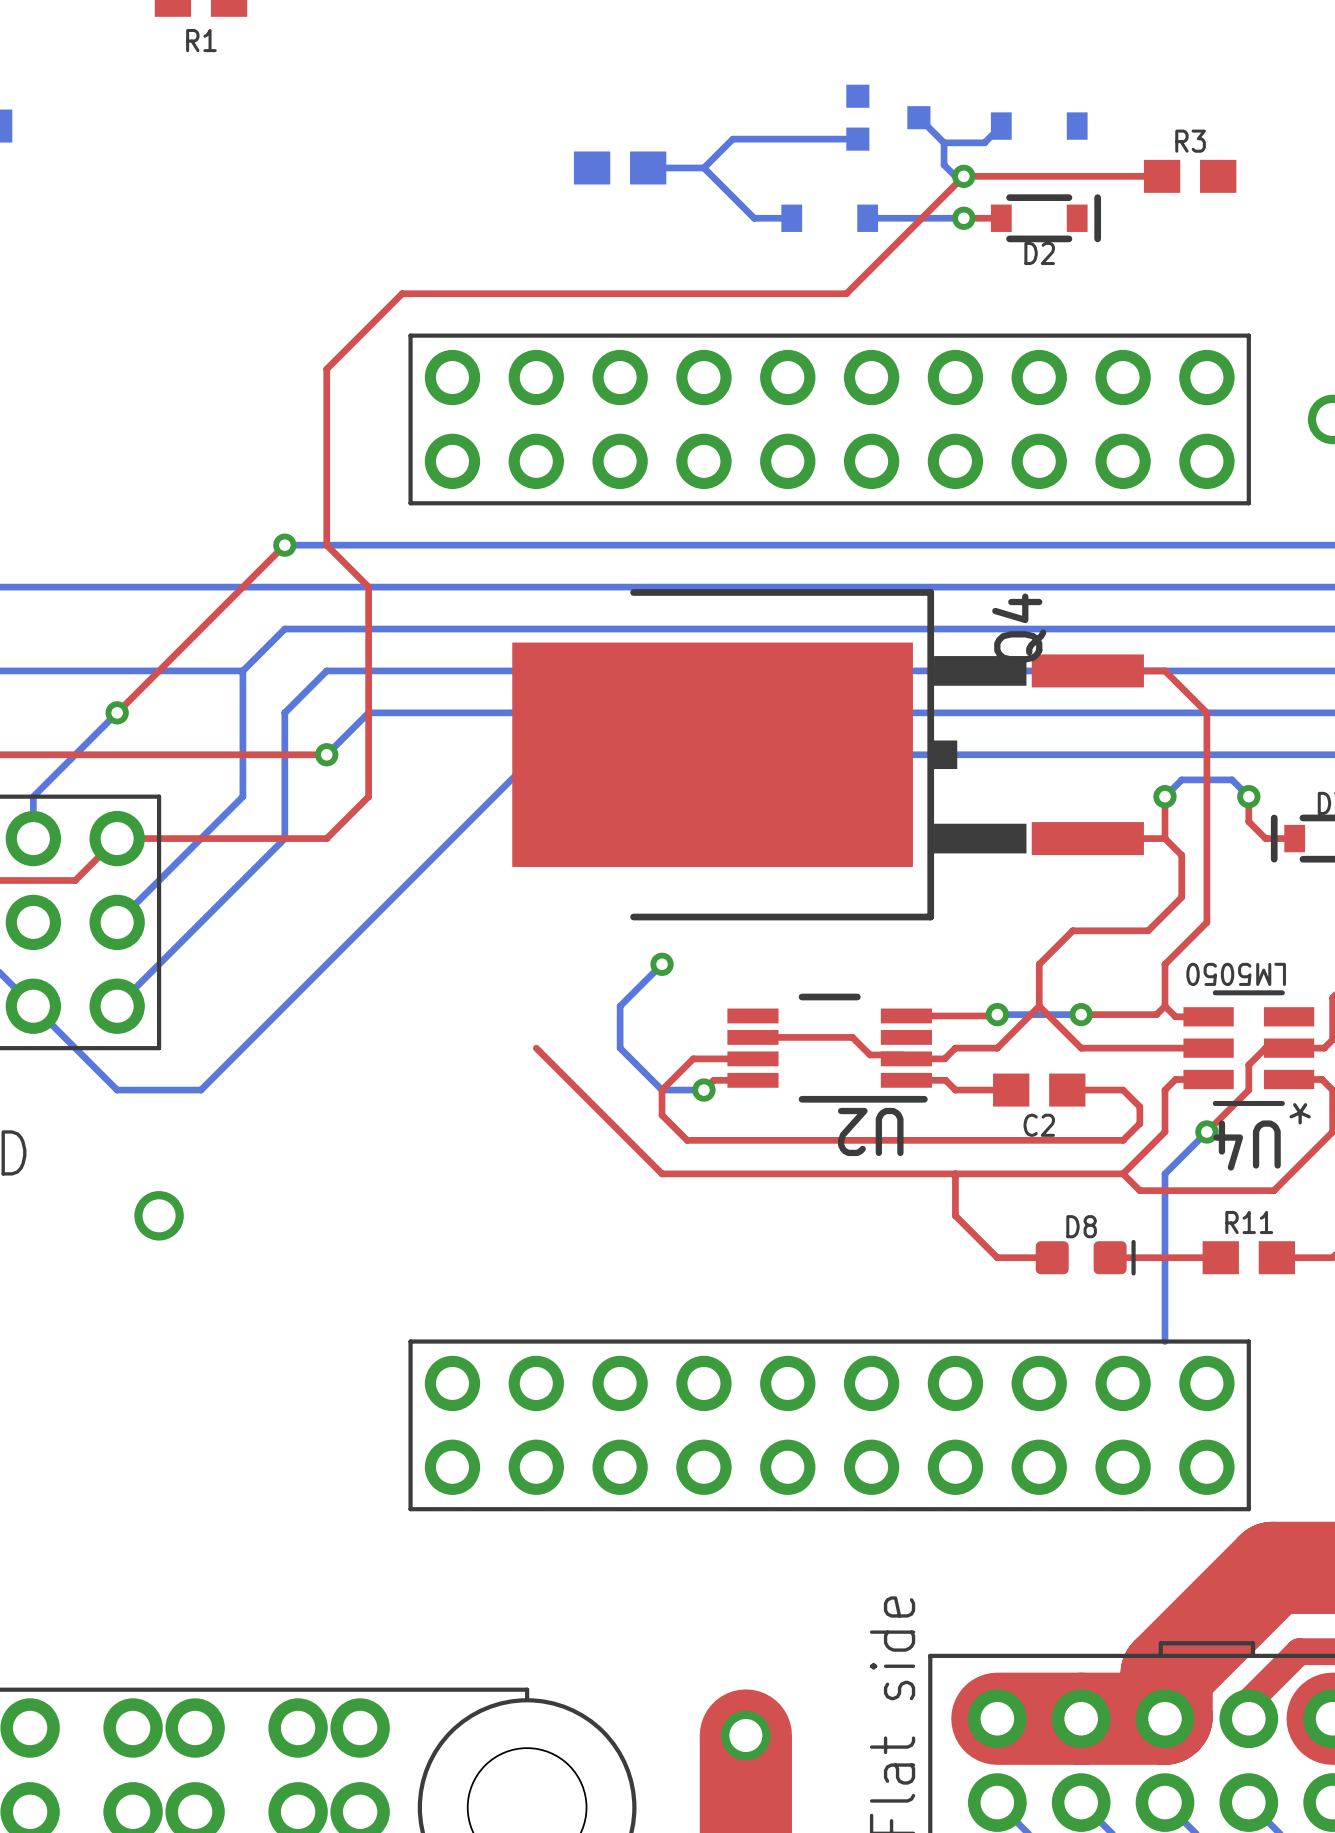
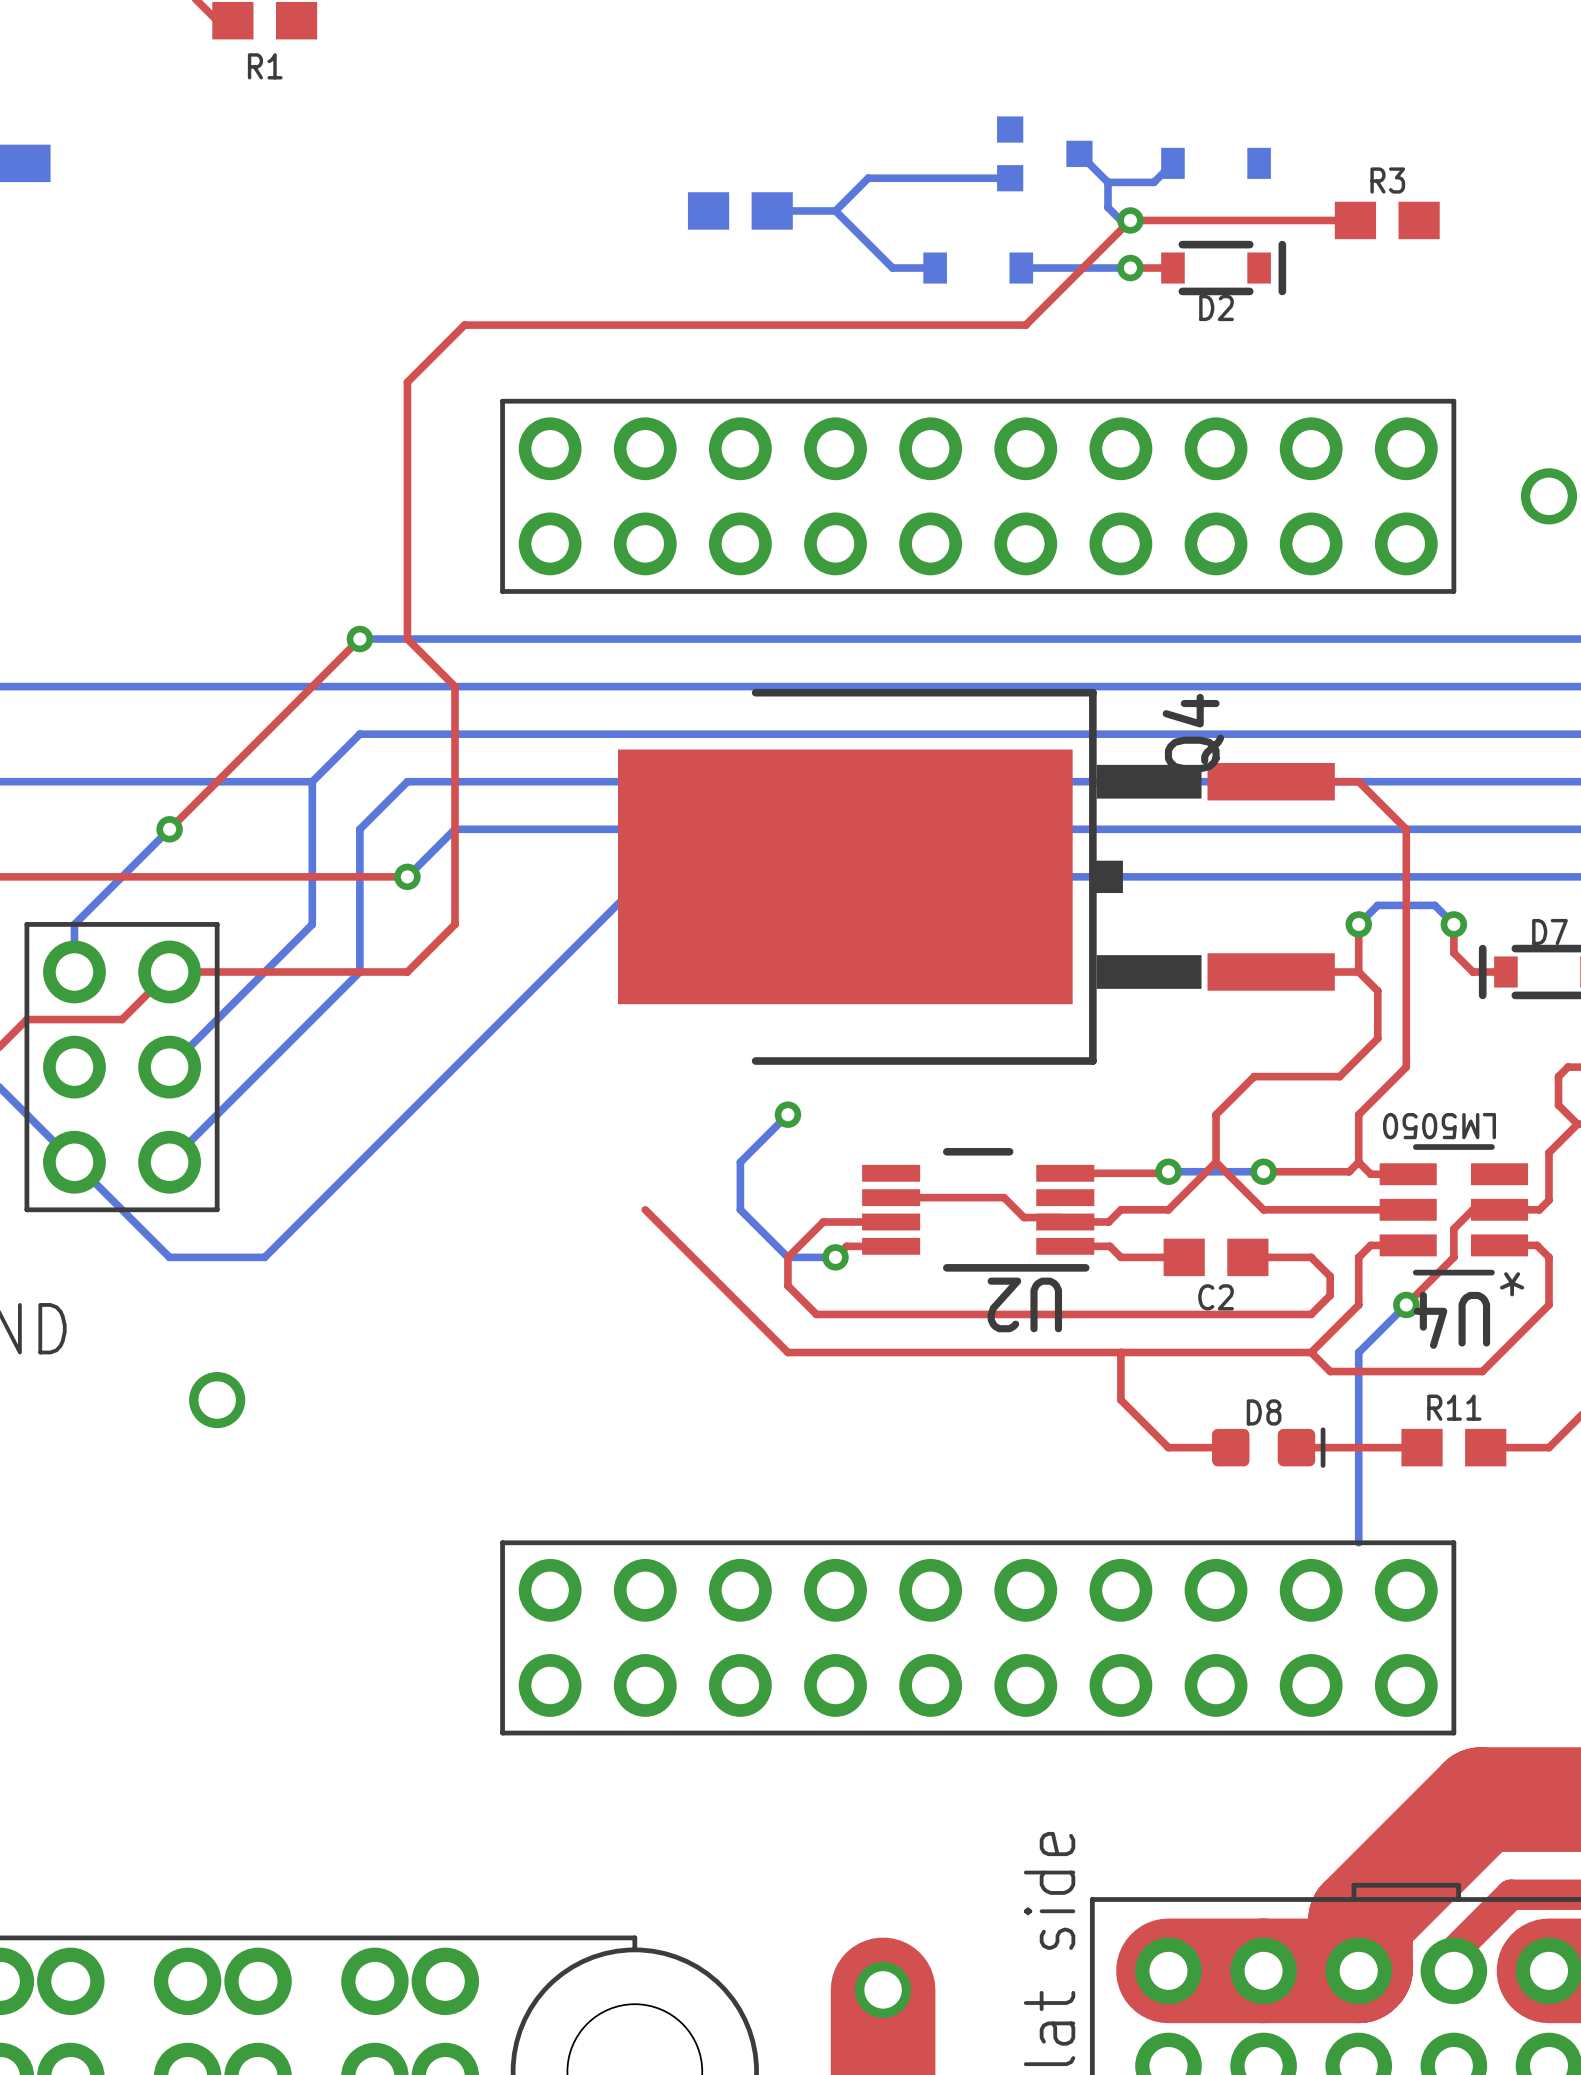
top track: (871, 268) (846, 293) (402, 293) (326, 369) -> (1025, 325) (464, 325) (407, 382) (407, 439)

